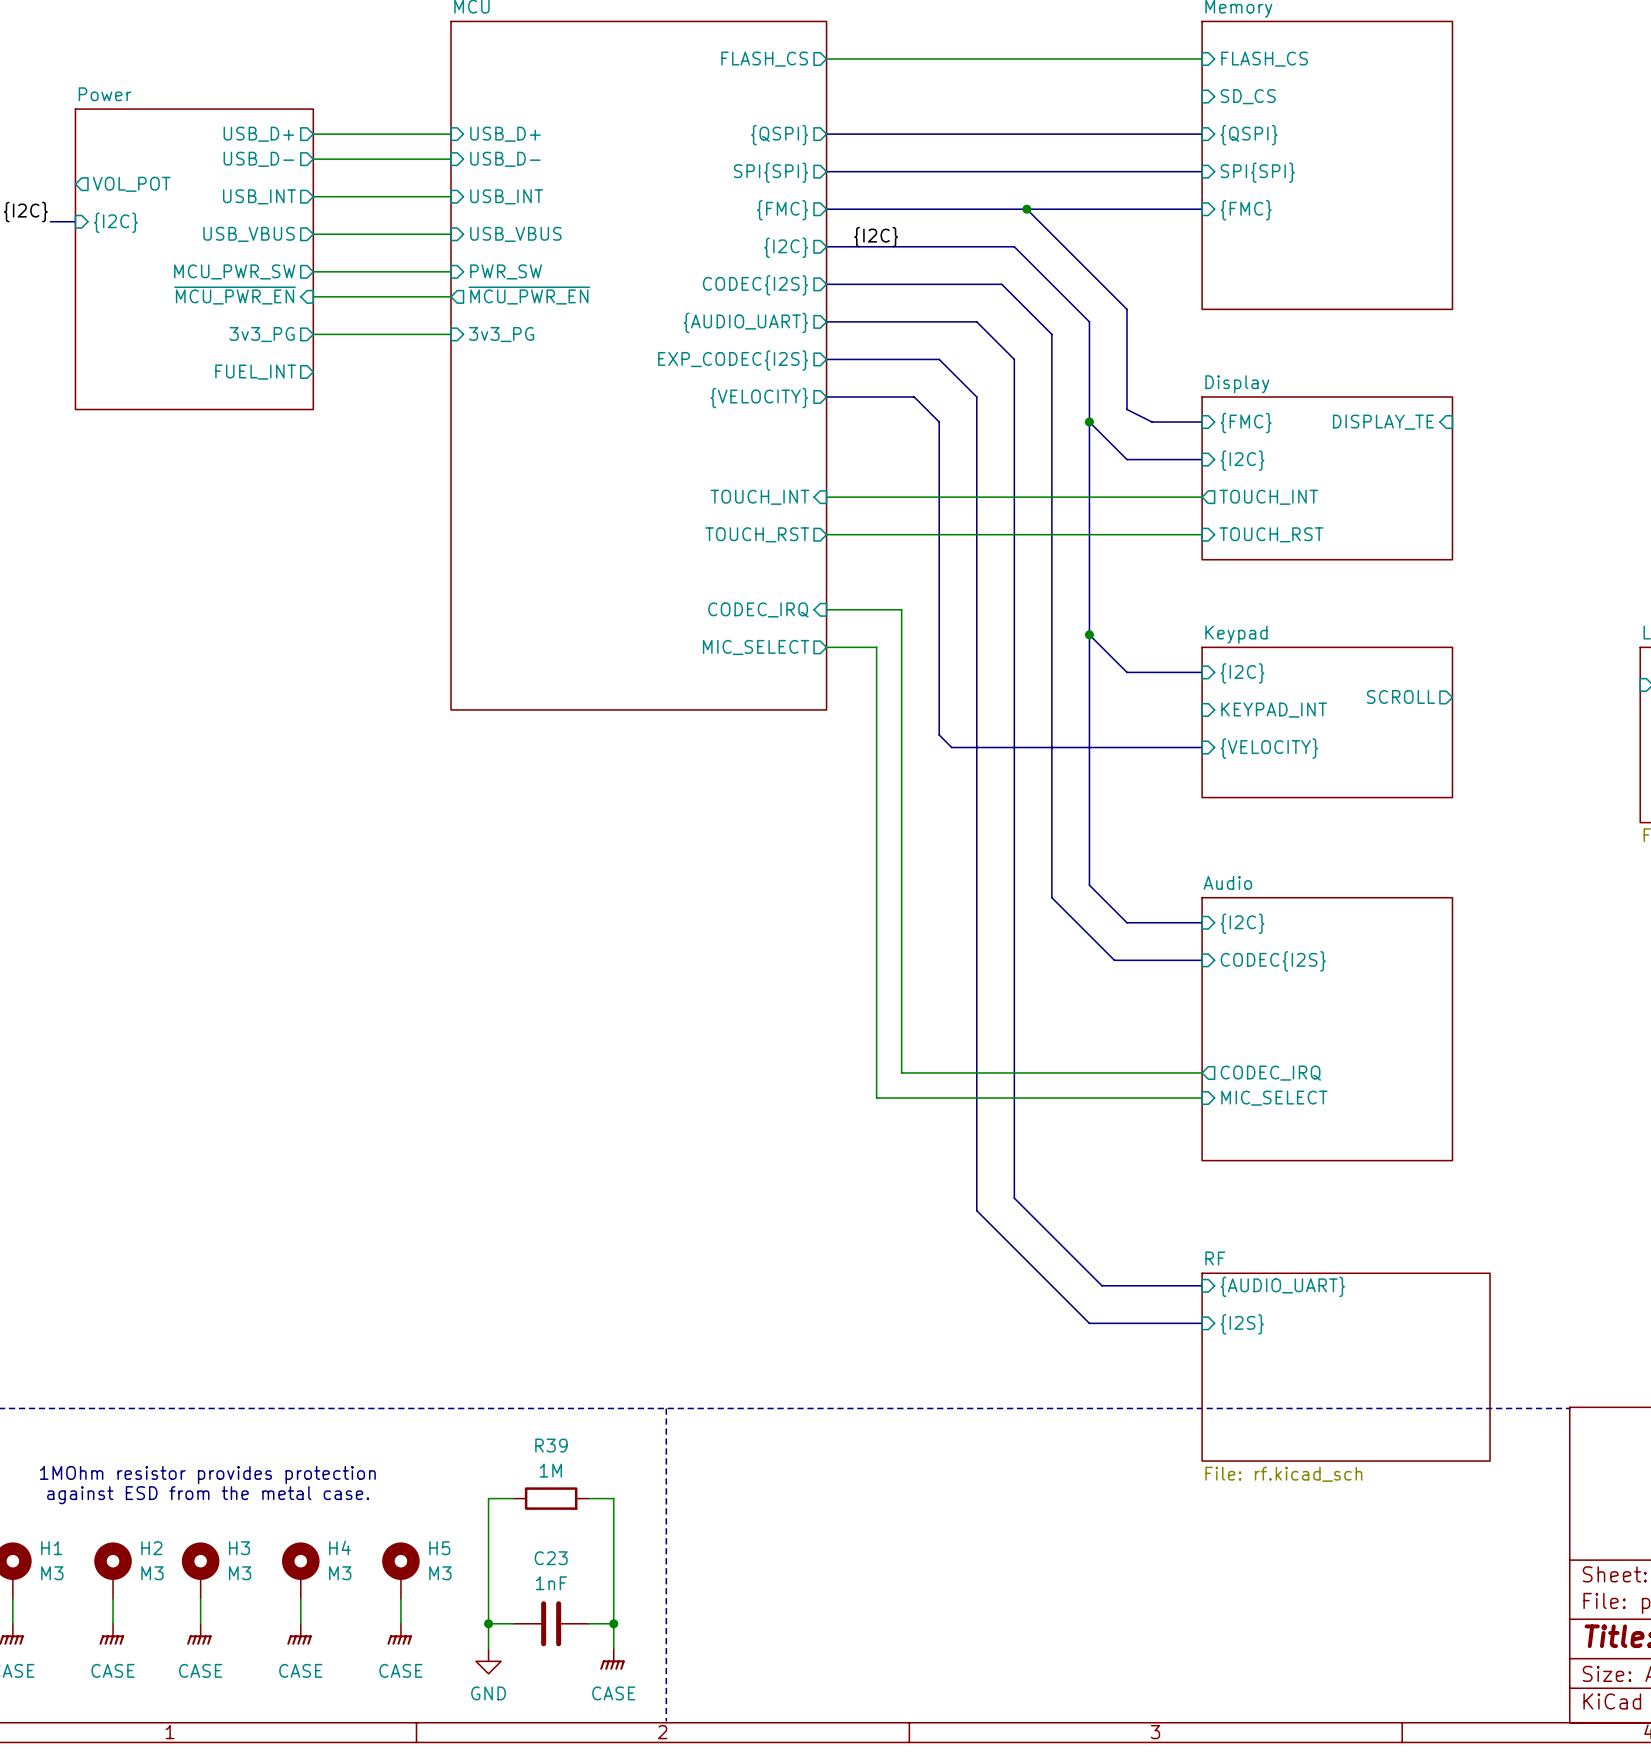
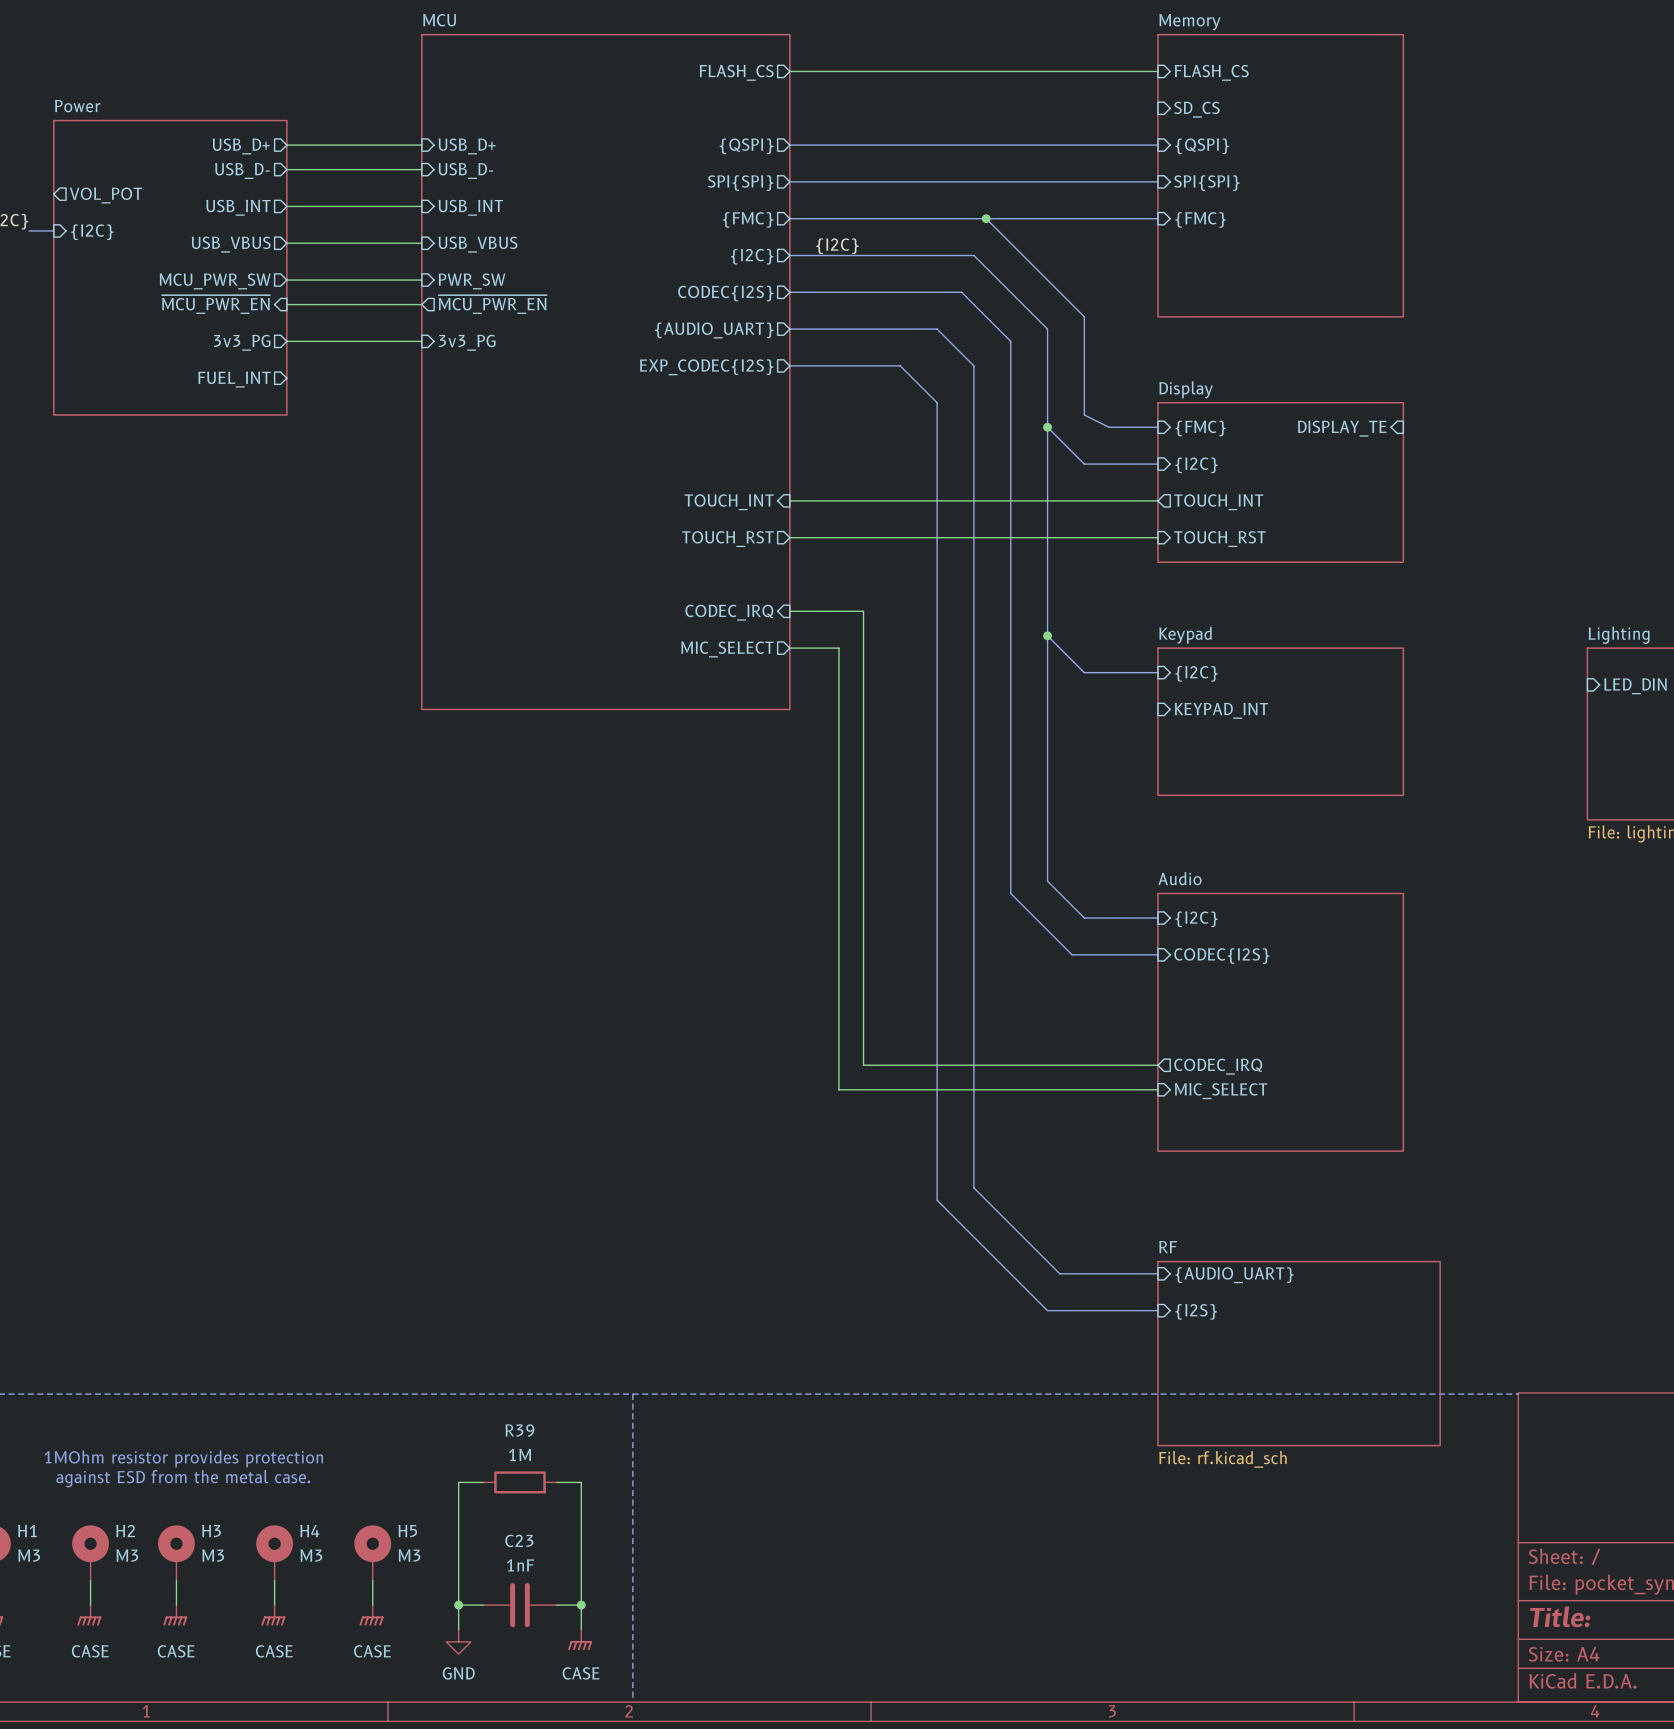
bus: (826, 396) (914, 396) (939, 422) (939, 734) (951, 747) (1202, 747) -> none
sheet pin: {VELOCITY} (759, 398) -> none
sheet pin: SCROLL (1401, 696) -> none
sheet pin: {VELOCITY} (1269, 748) -> none

